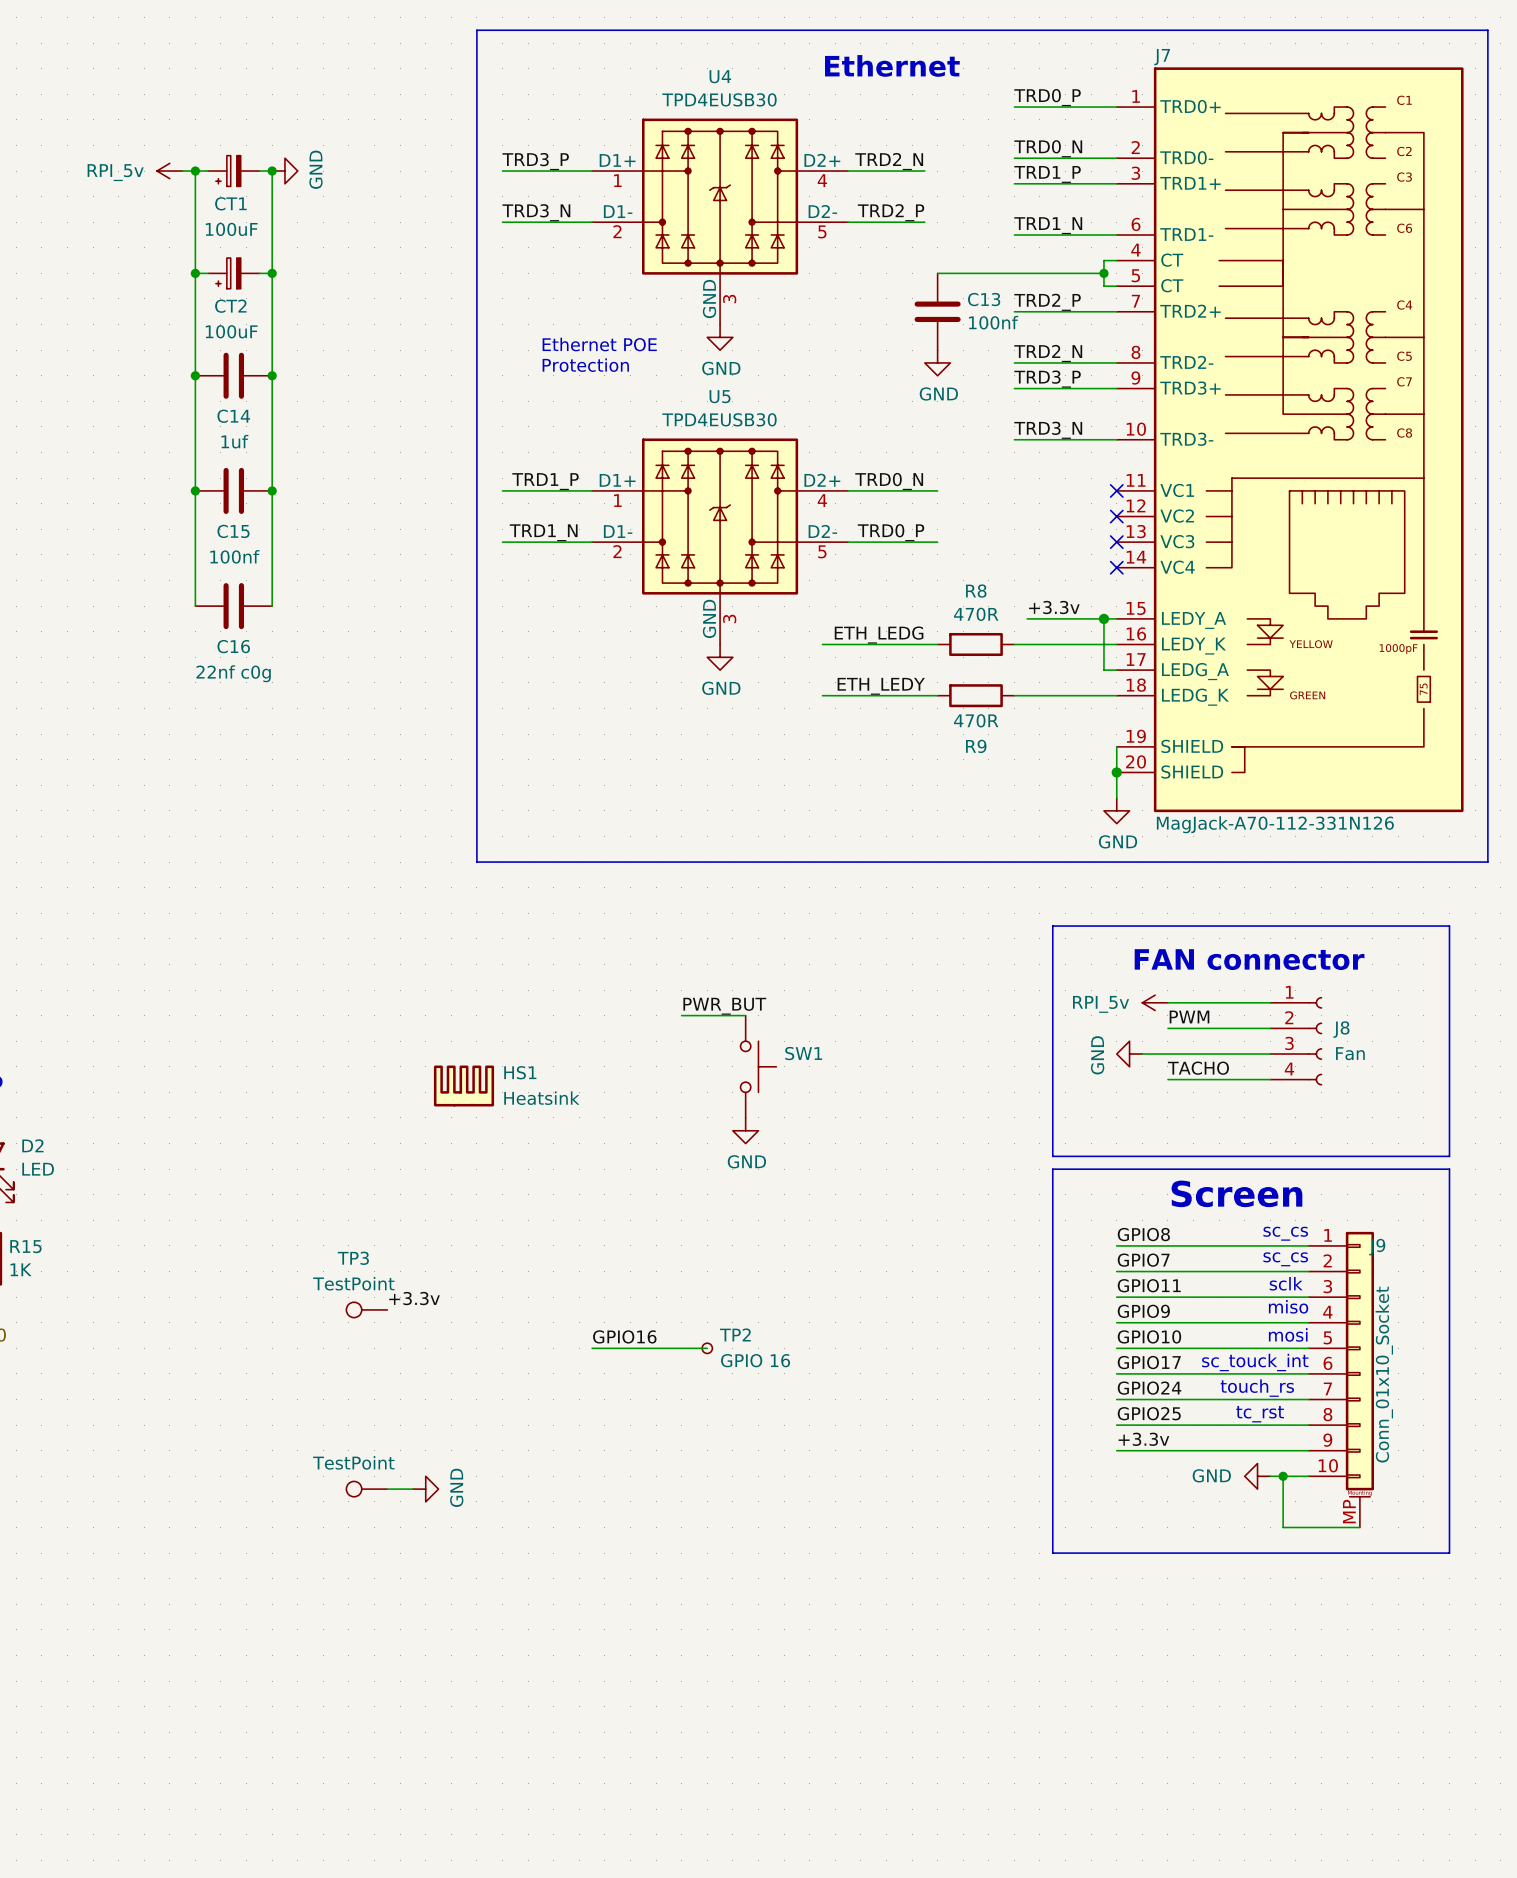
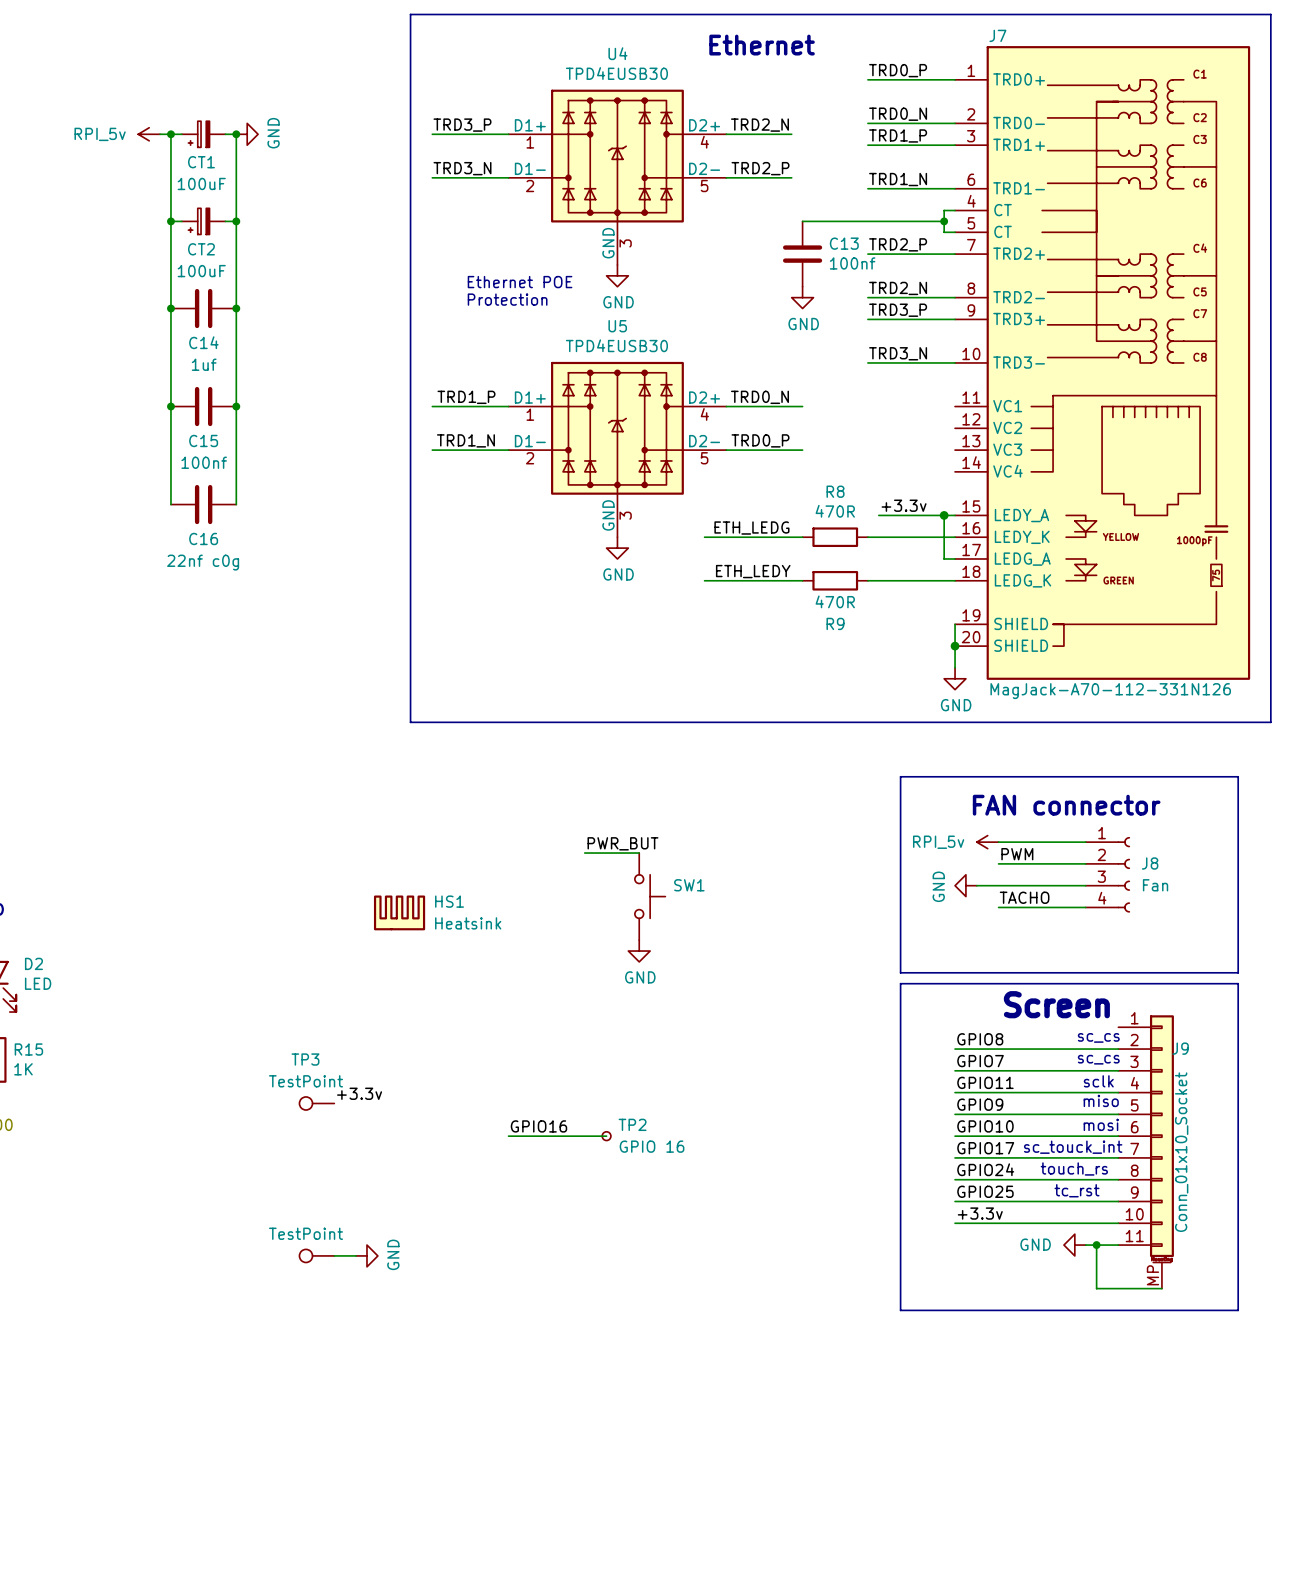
no-connect mark: (1116, 490) -> none
no-connect mark: (1116, 516) -> none
no-connect mark: (1116, 542) -> none
no-connect mark: (1116, 567) -> none
J9 symbol: [1308, 1231, 1374, 1528] -> [1118, 1015, 1174, 1289]

